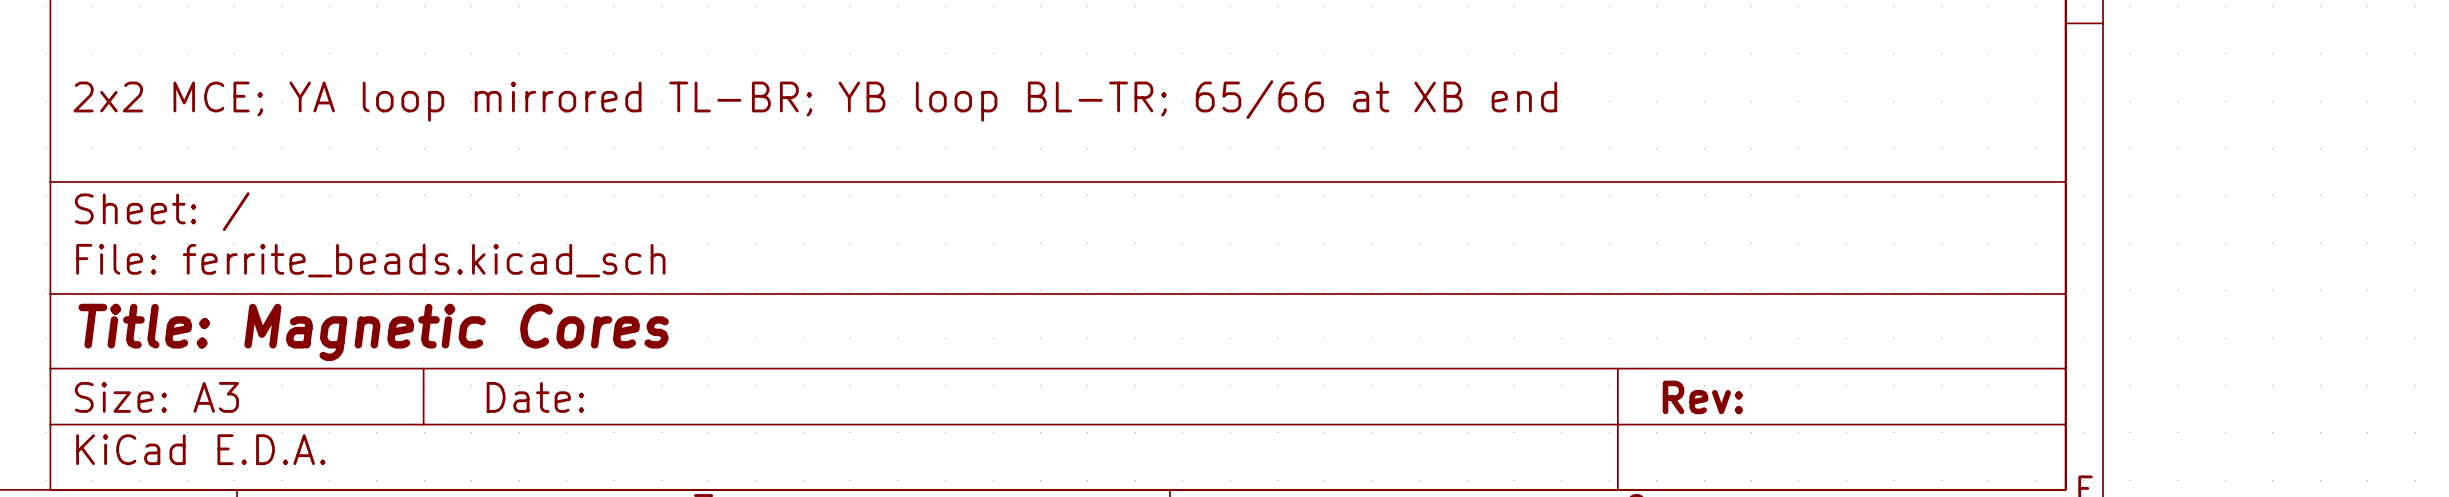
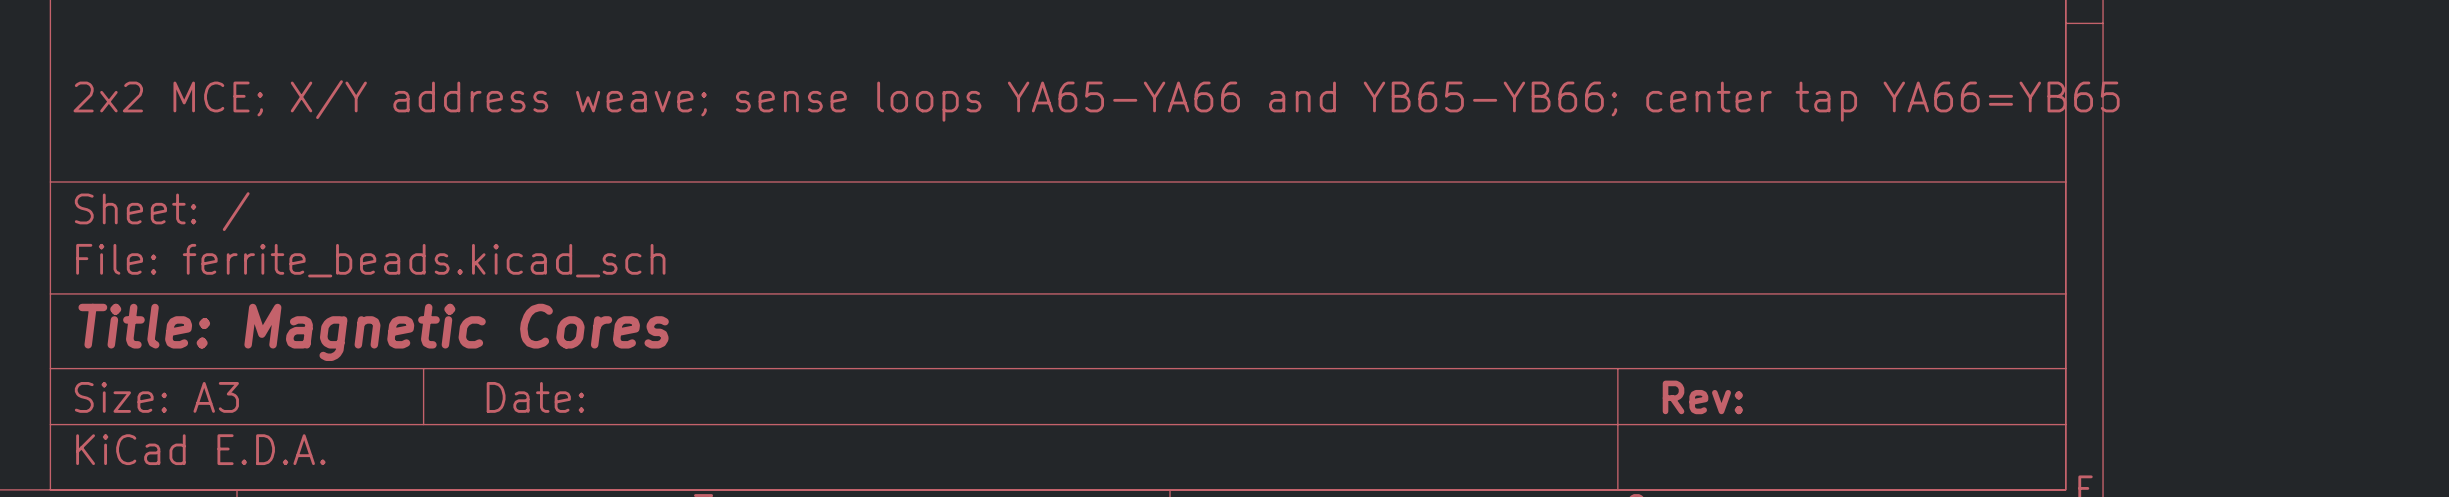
title block: 2x2 MCE; YA loop mirrored TL-BR; YB loop BL-TR; 65/66 at XB end (815, 100) -> 2x2 MCE; X/Y address weave; sense loops YA65-YA66 and YB65-YB66; center tap YA66=YB65 (1096, 100)

